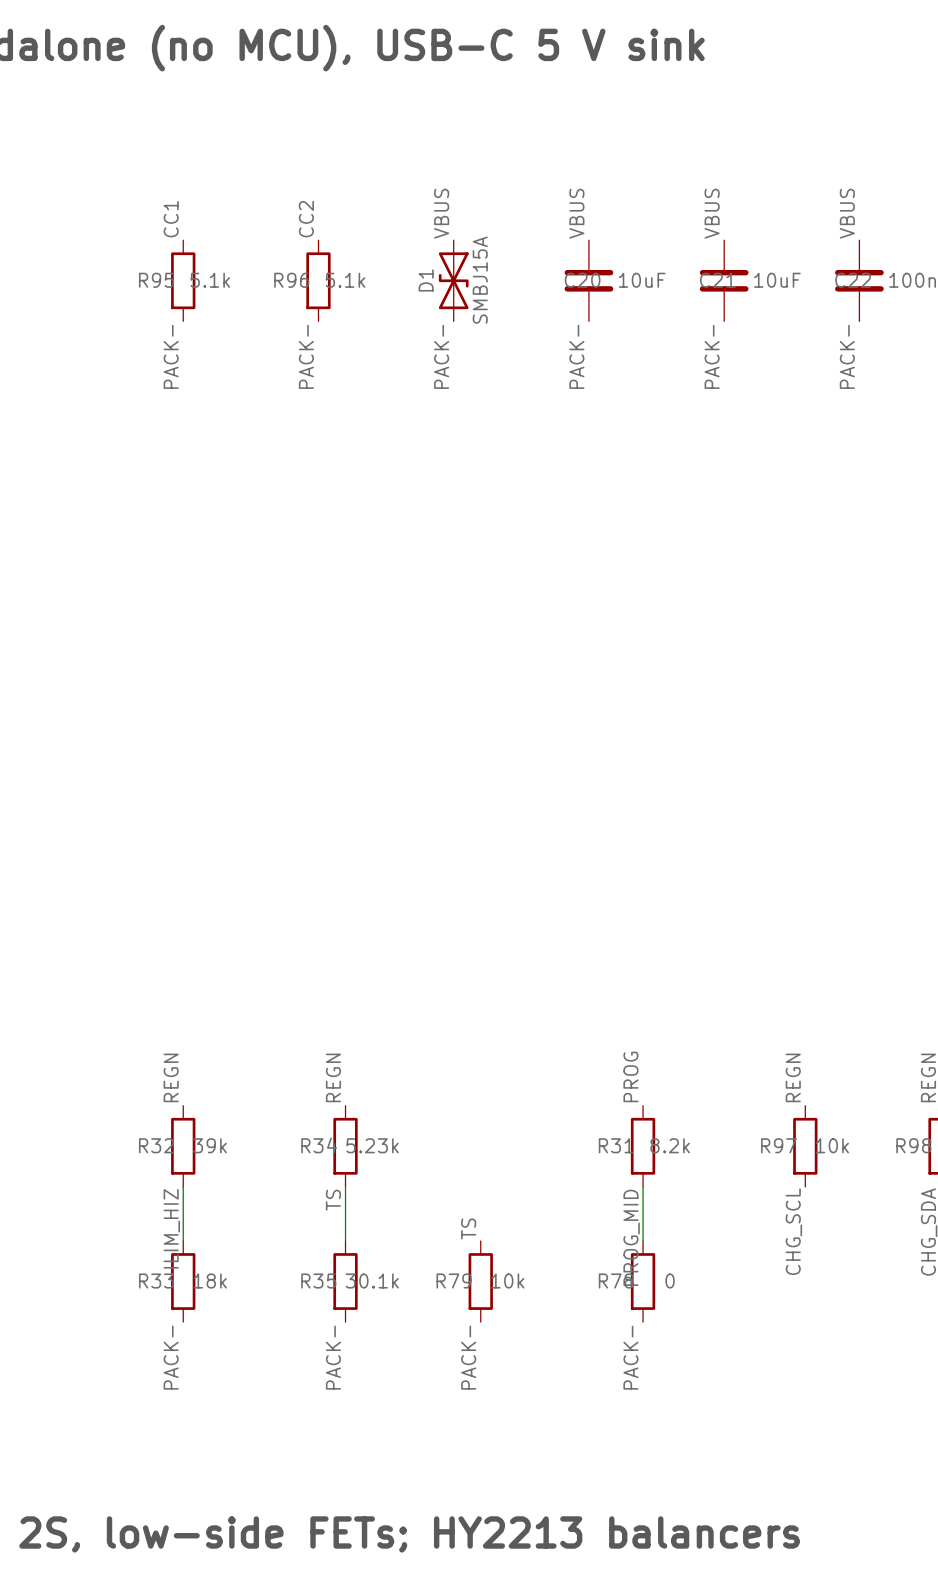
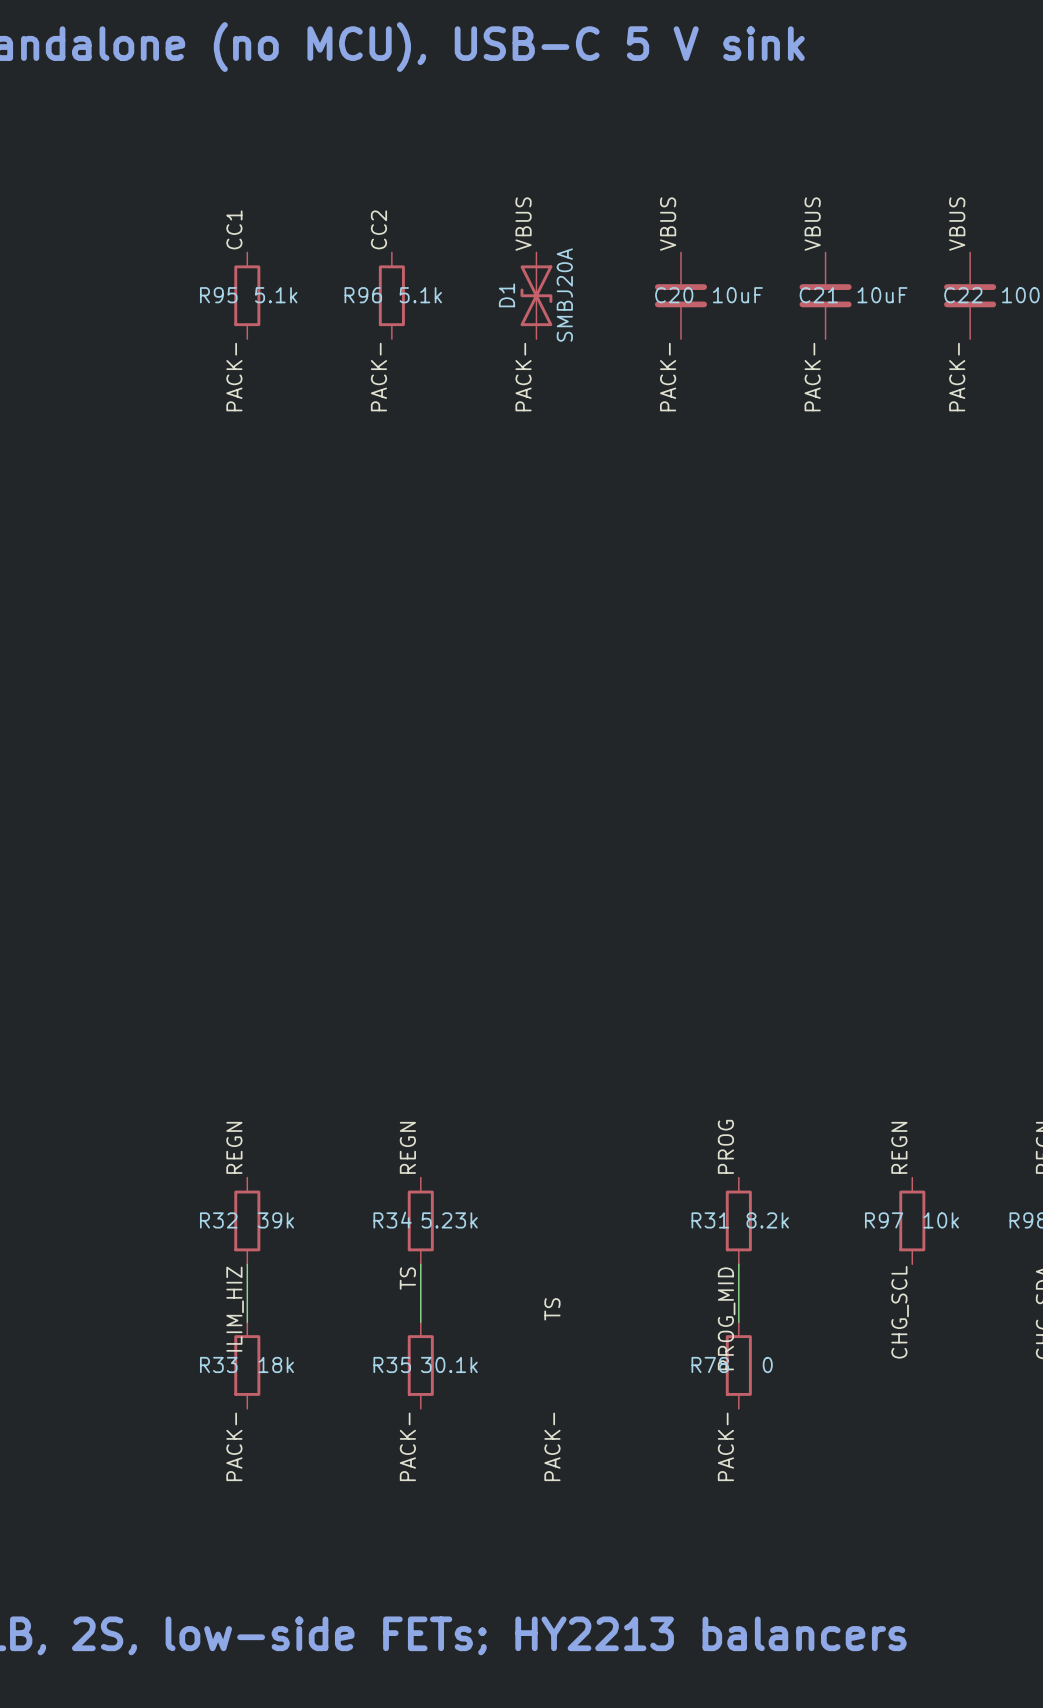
D1 value: SMBJ15A (480, 280) -> SMBJ20A (564, 295)
R79: 10k (480, 1281) -> none

